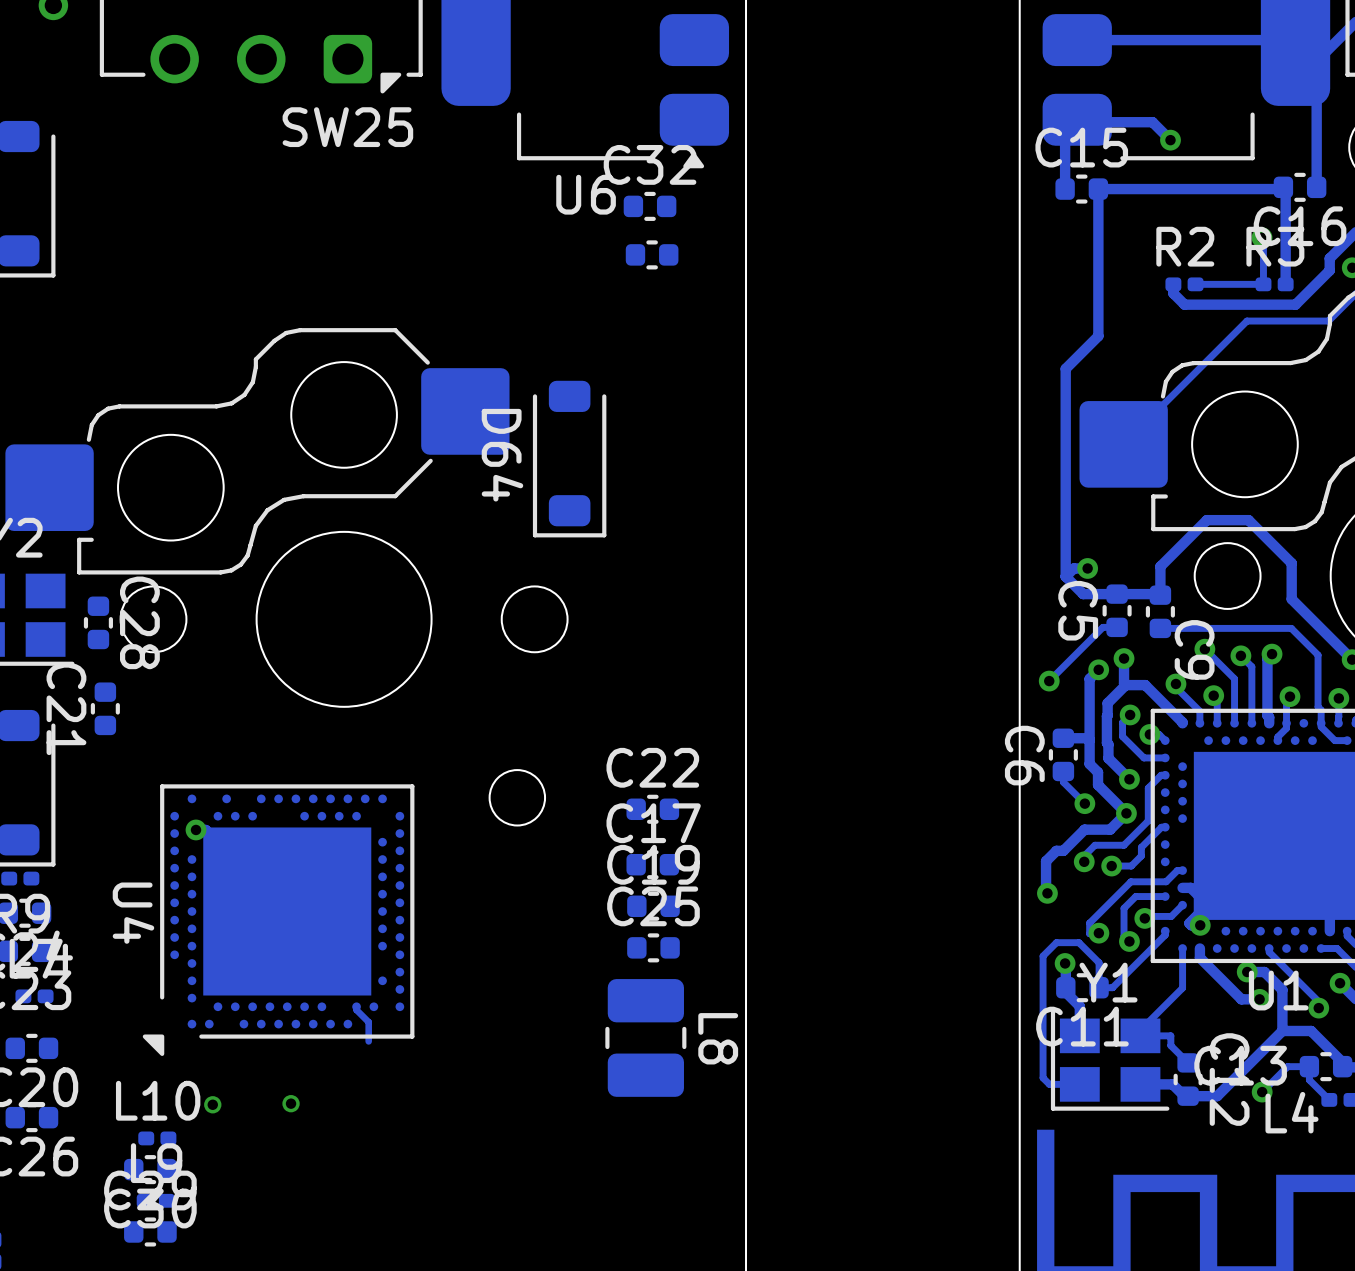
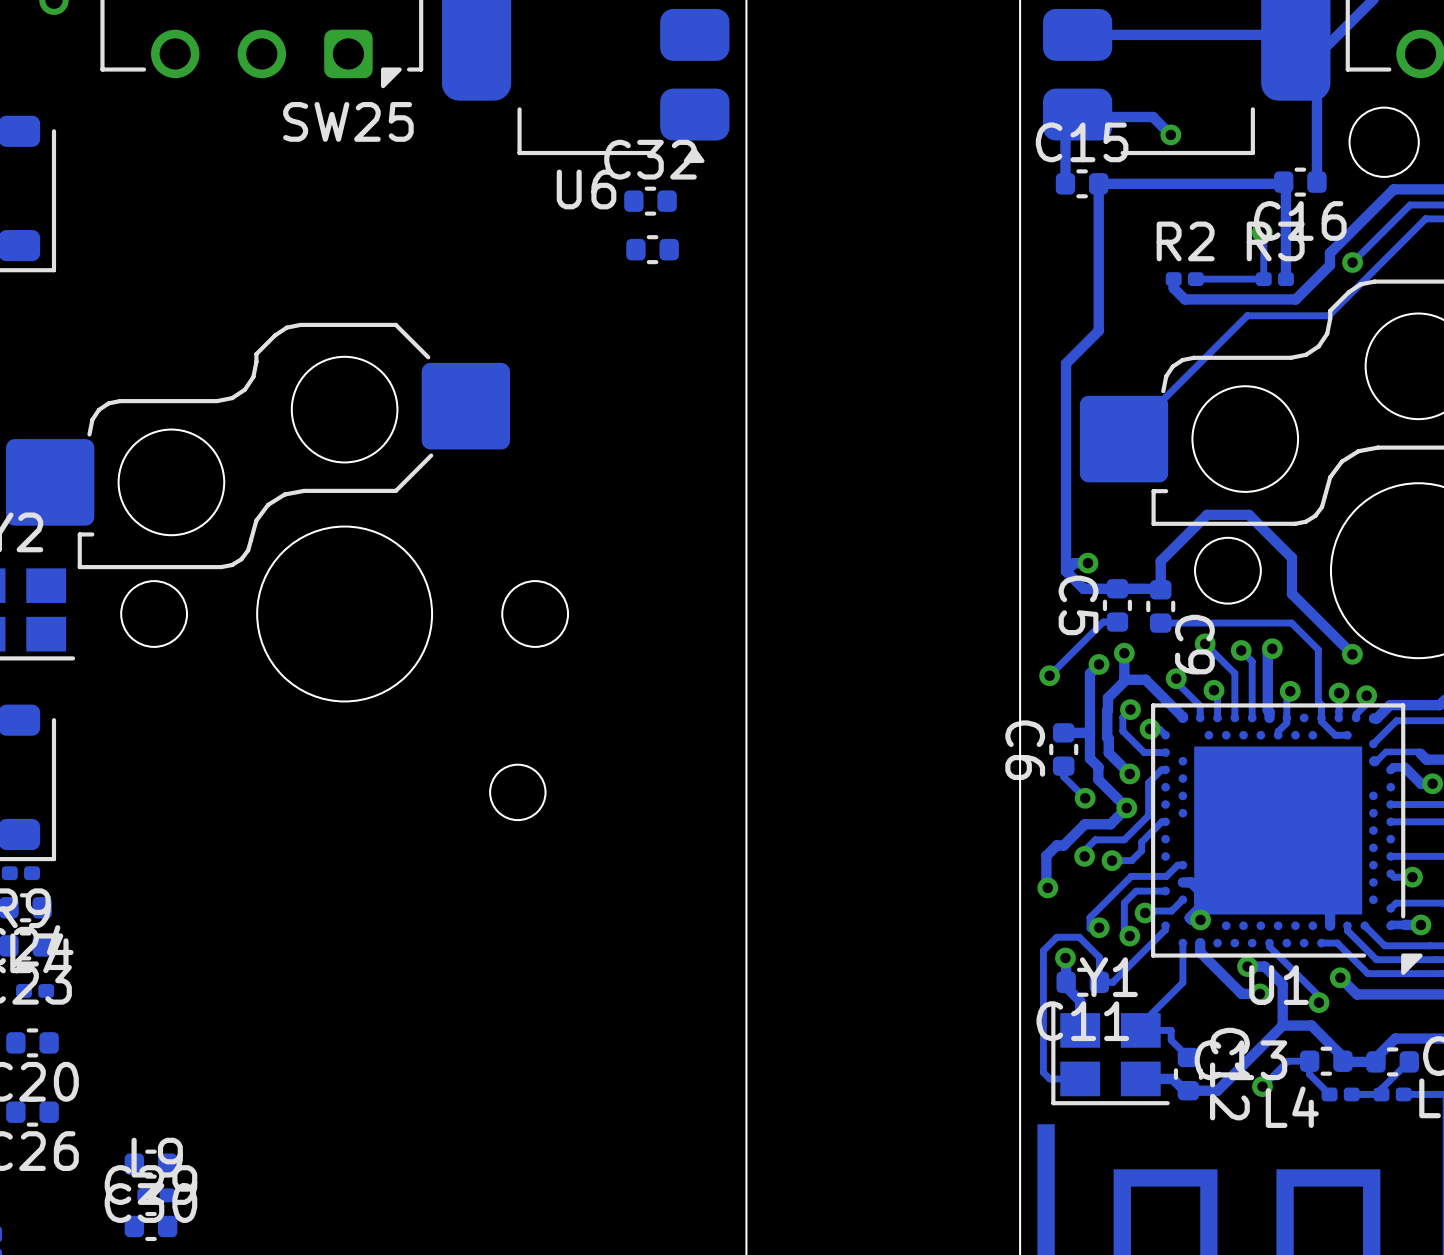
D64: (569, 459) -> none
C28: (98, 622) -> none
C21: (105, 708) -> none
C22: (652, 809) -> none
via: (196, 829) -> none
C17: (652, 864) -> none
C19: (653, 906) -> none
U4: (278, 920) -> none
C25: (653, 947) -> none
track: (356, 1006) (356, 1010) (368, 1022) (368, 1041) -> none
L8: (645, 1037) -> none
via: (291, 1103) -> none
via: (212, 1104) -> none
L10: (157, 1138) -> none

